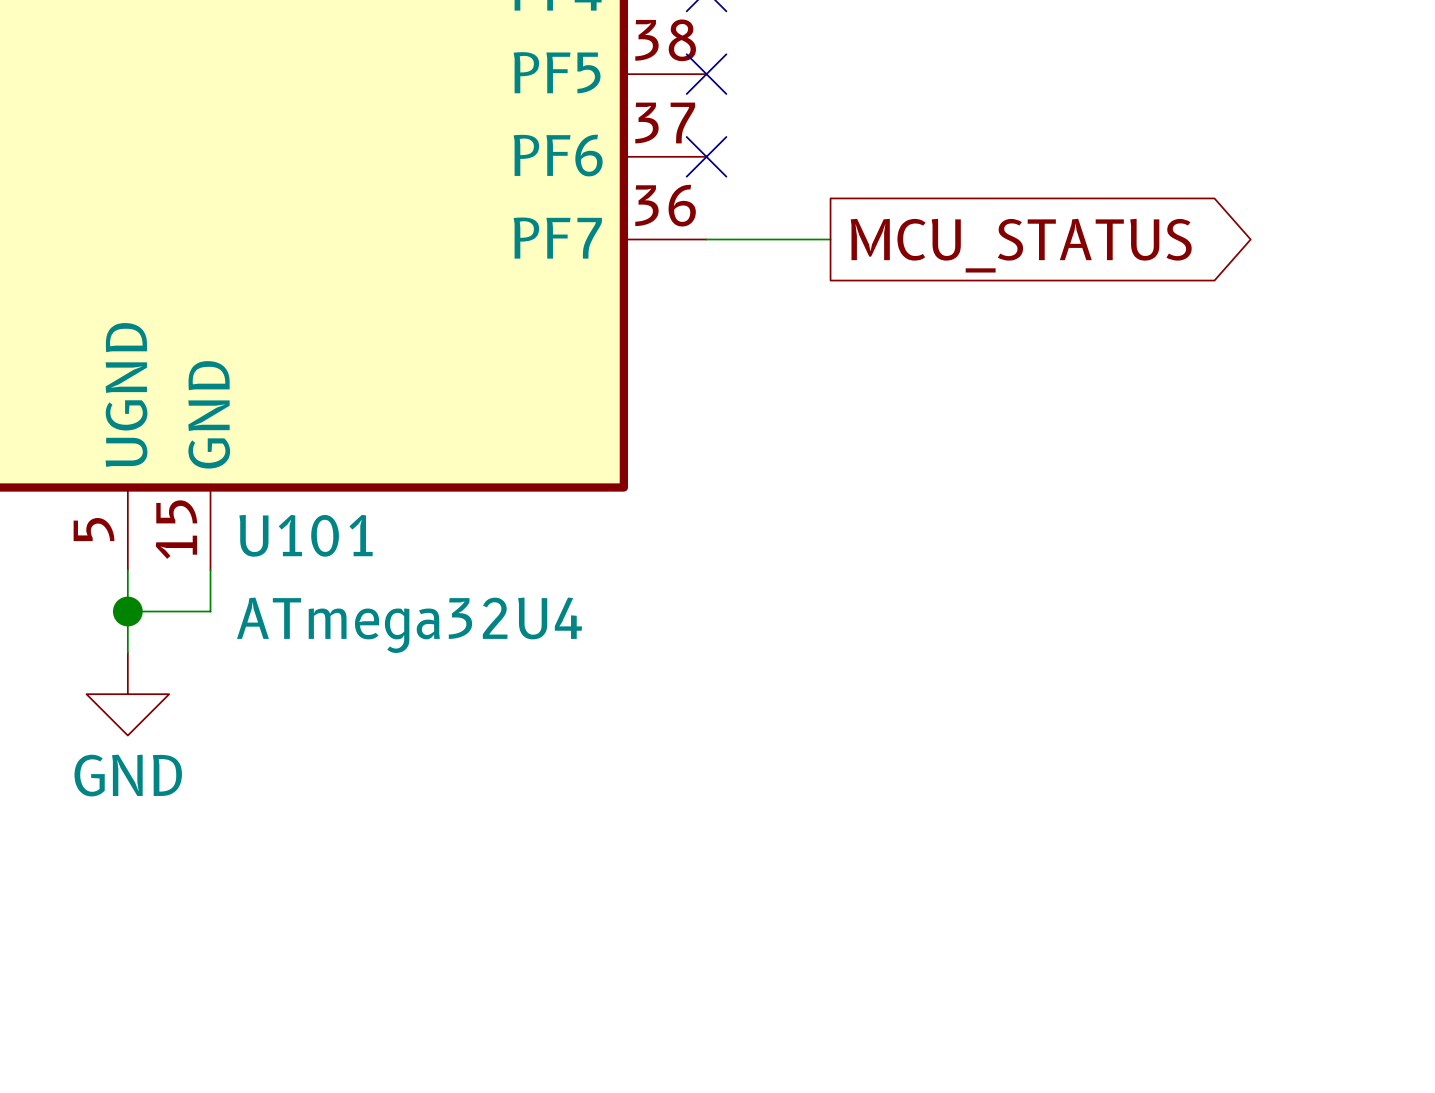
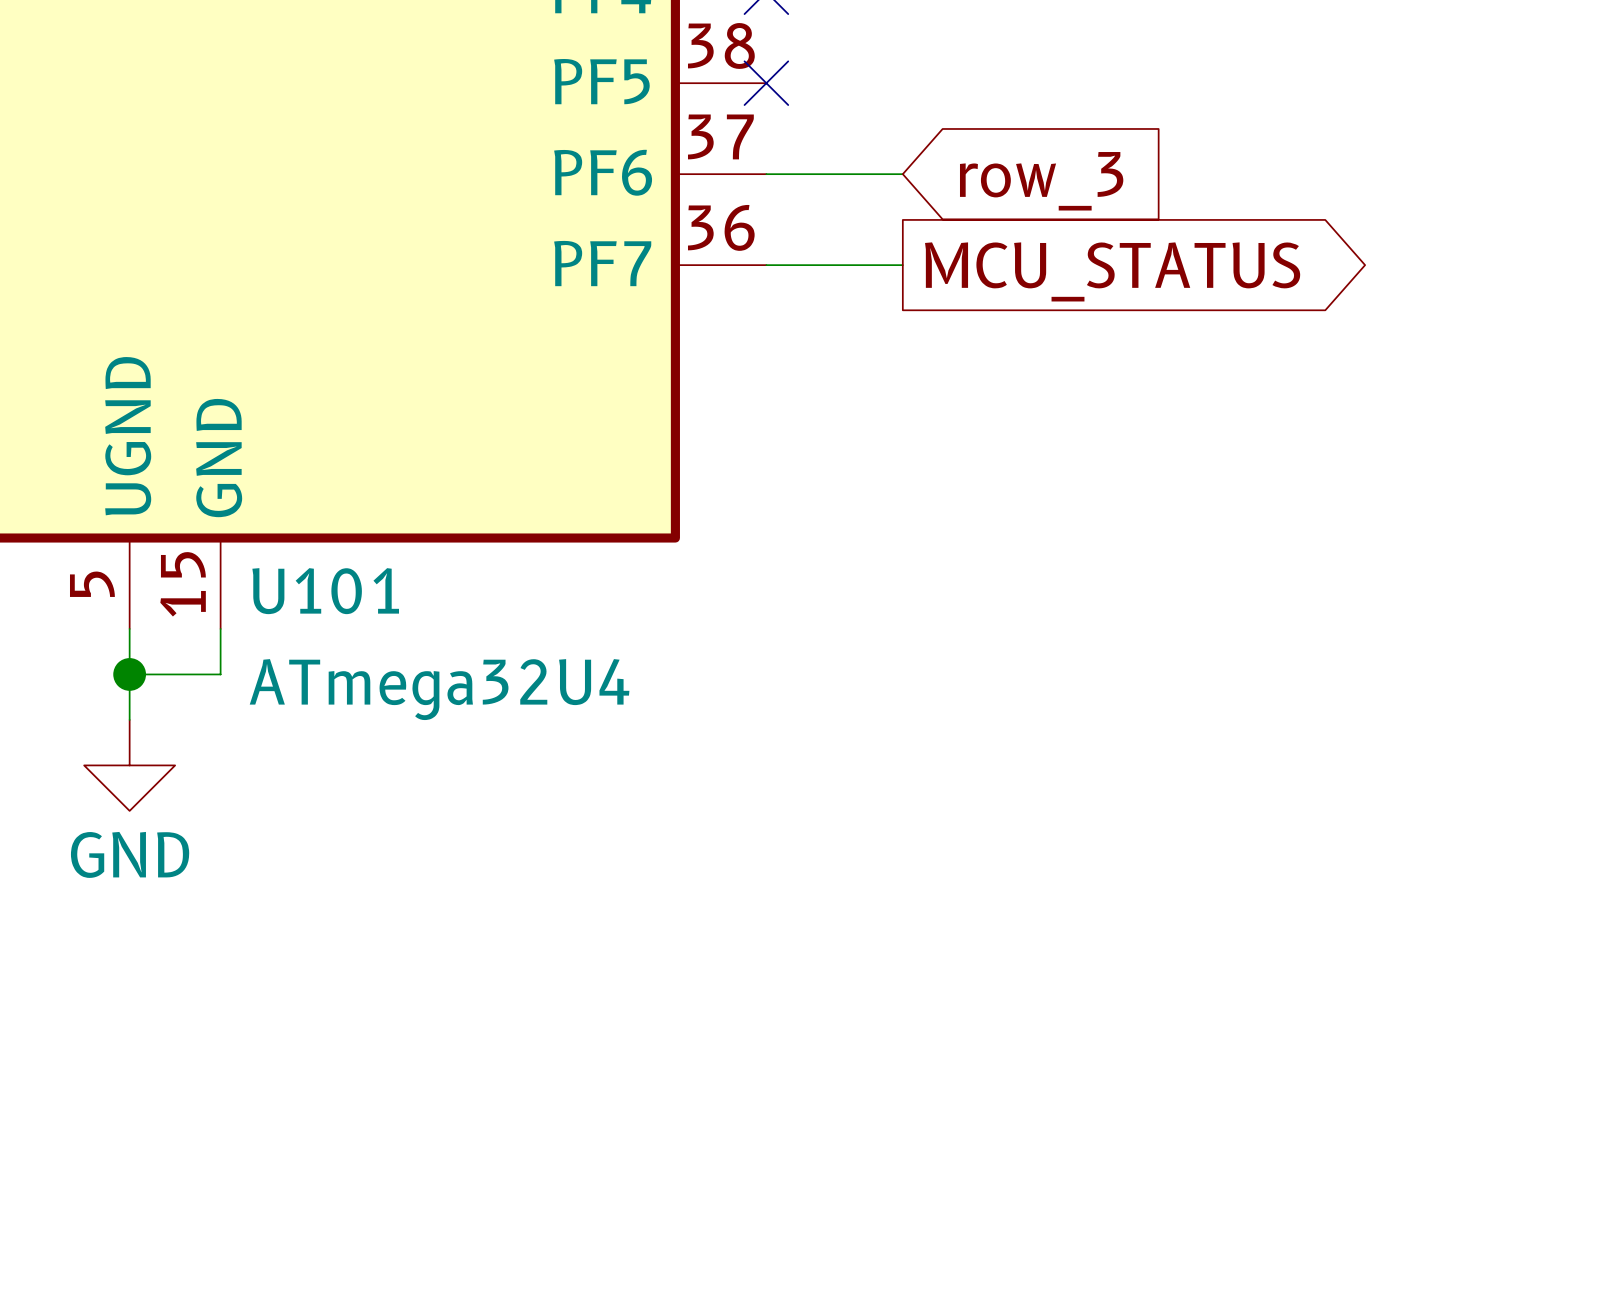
wire: none -> (766, 174) (902, 174)
no-connect mark: (706, 156) -> none
global label: none -> row_3 (1041, 181)

